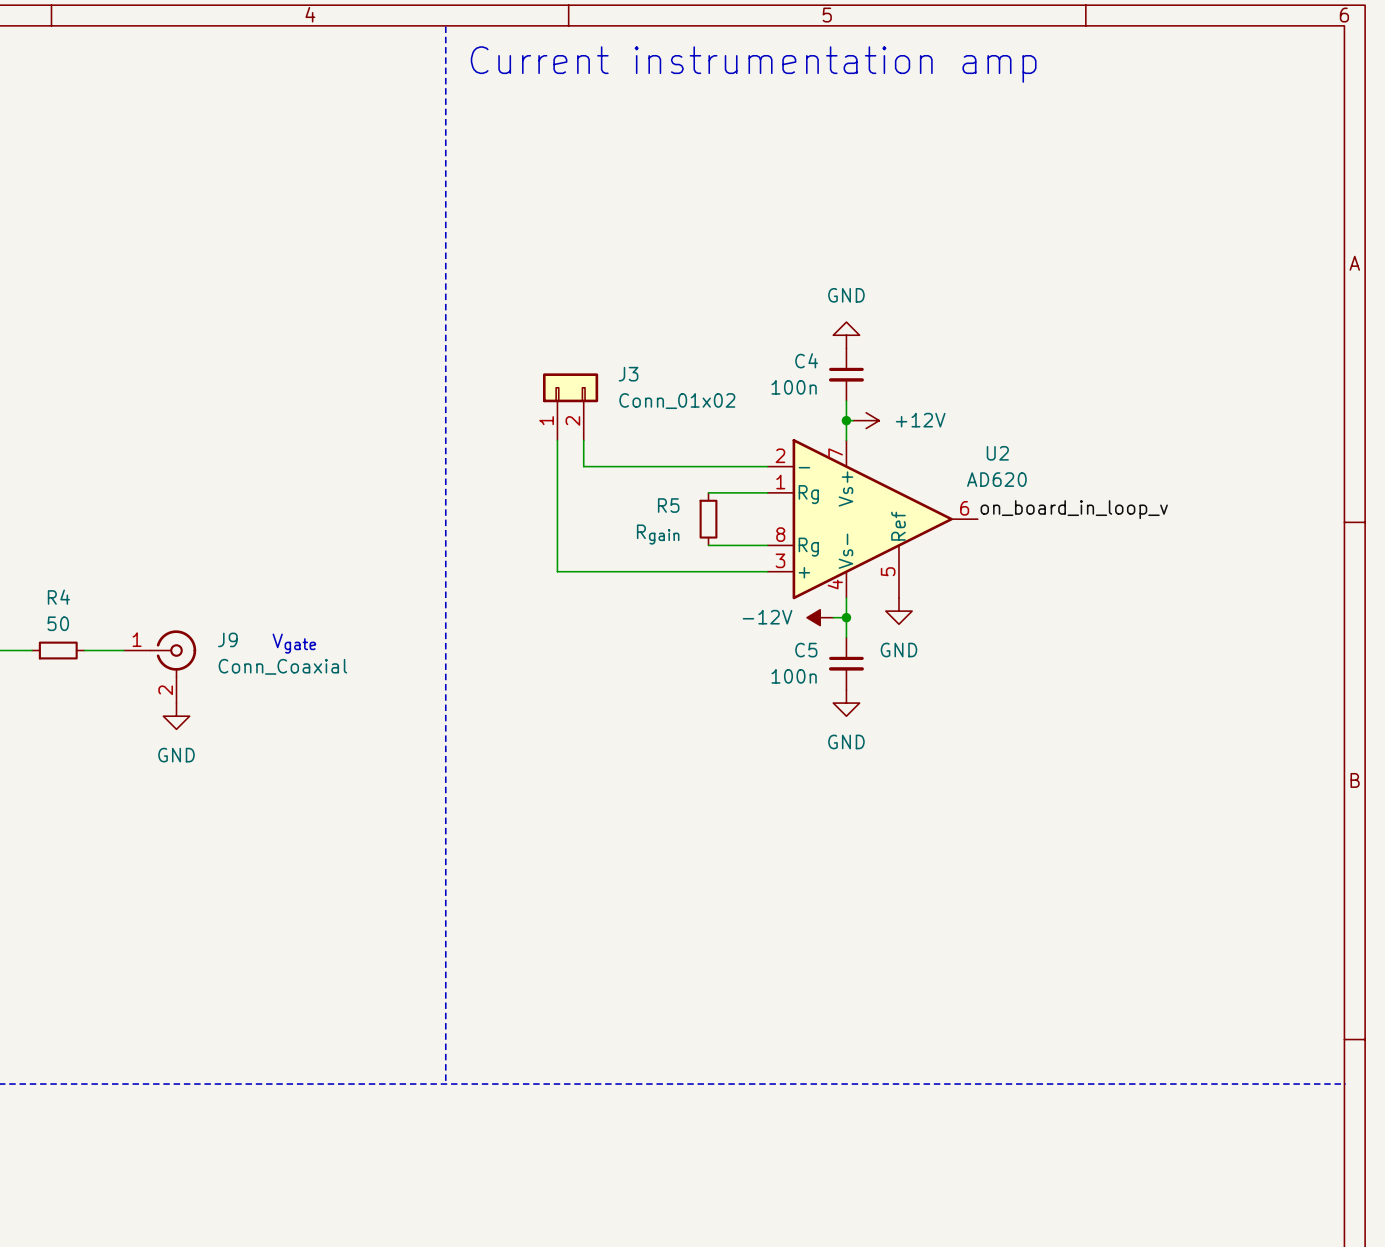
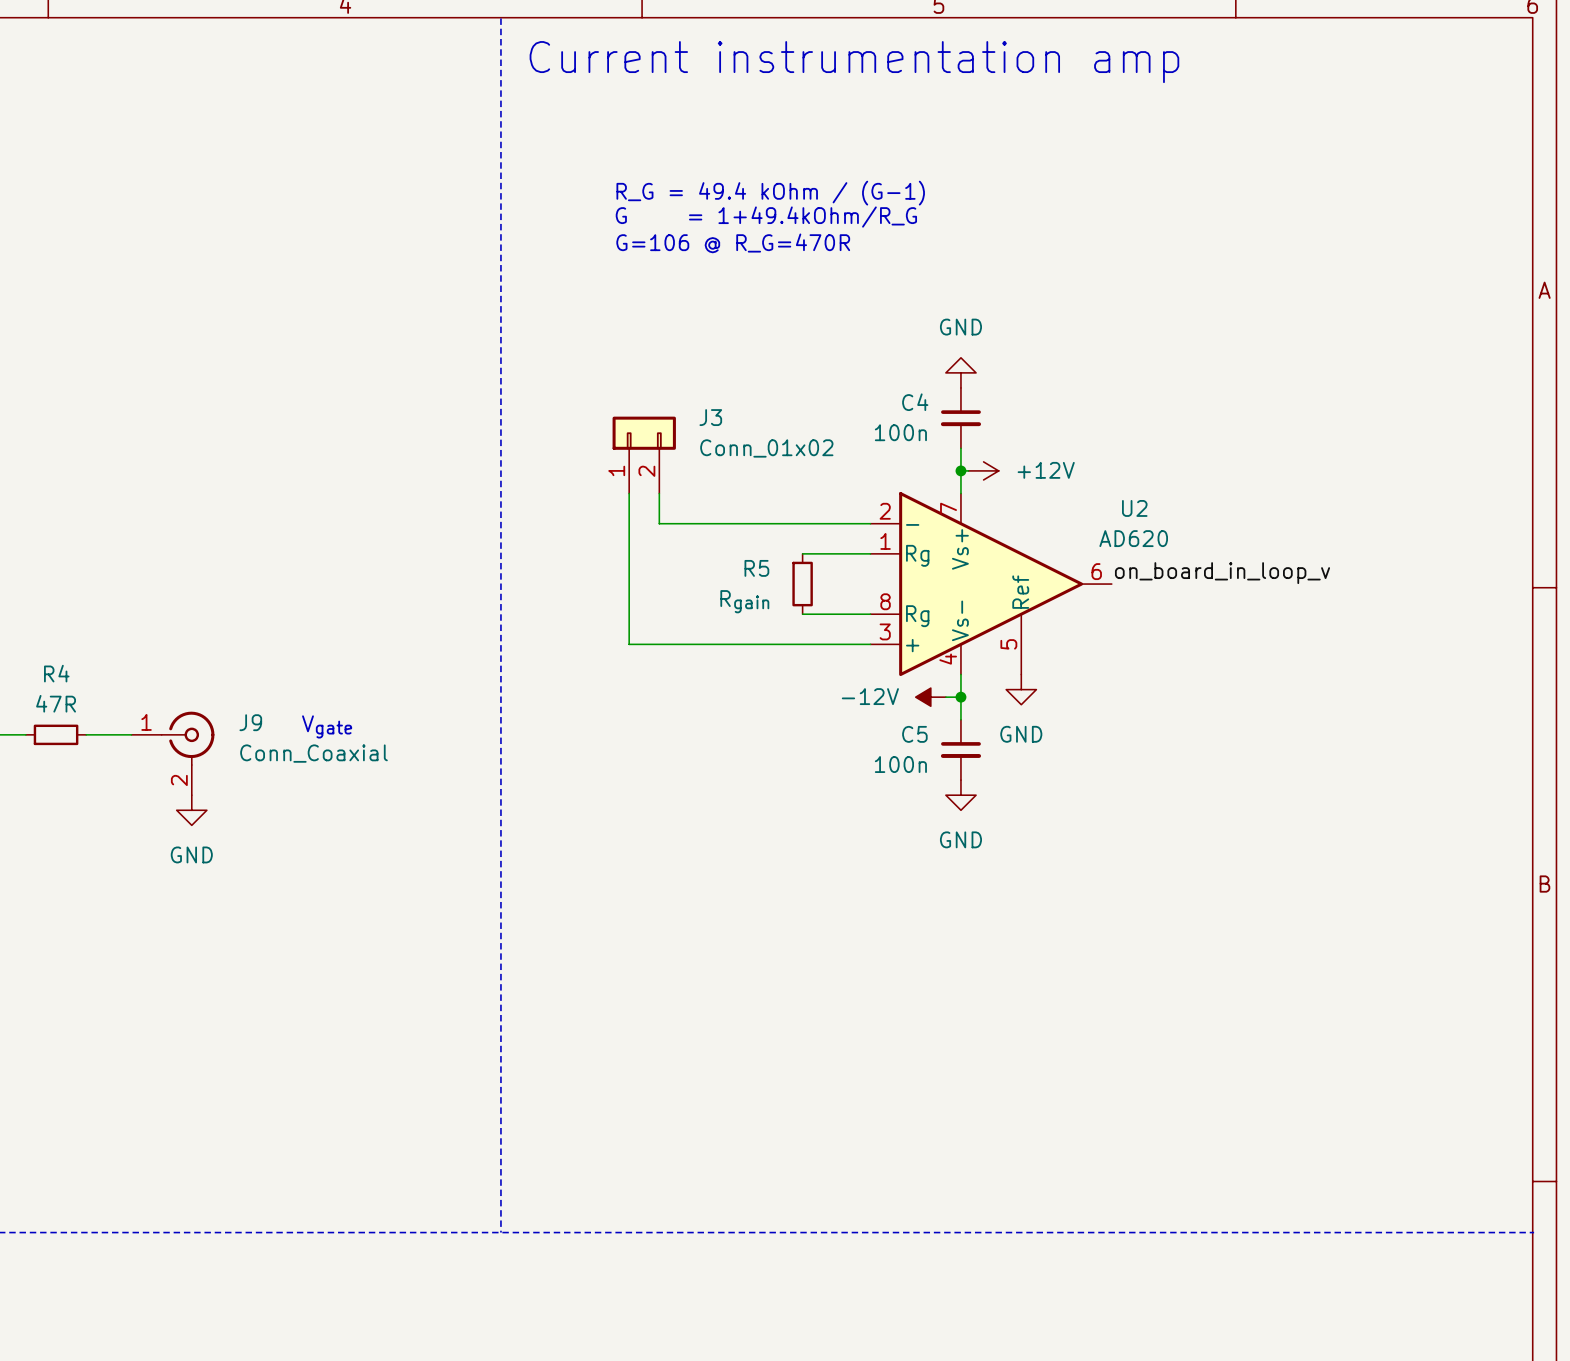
text: none -> R_G = 49.4 kOhm / (G-1) (770, 193)
text: none -> G = 1+49.4kOhm/R_G (766, 217)
text: none -> G=106 @ R_G=470R (733, 243)
R4 value: 50 (58, 623) -> 47R (56, 703)

